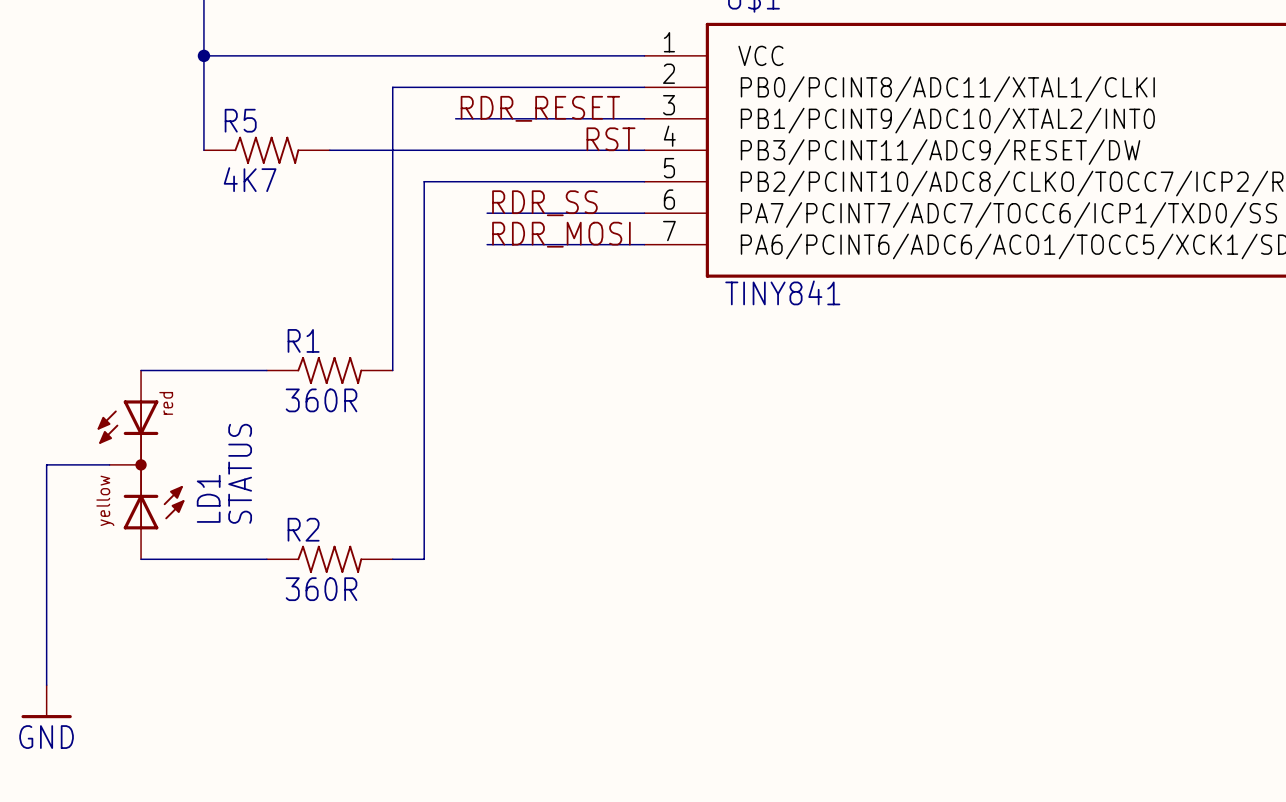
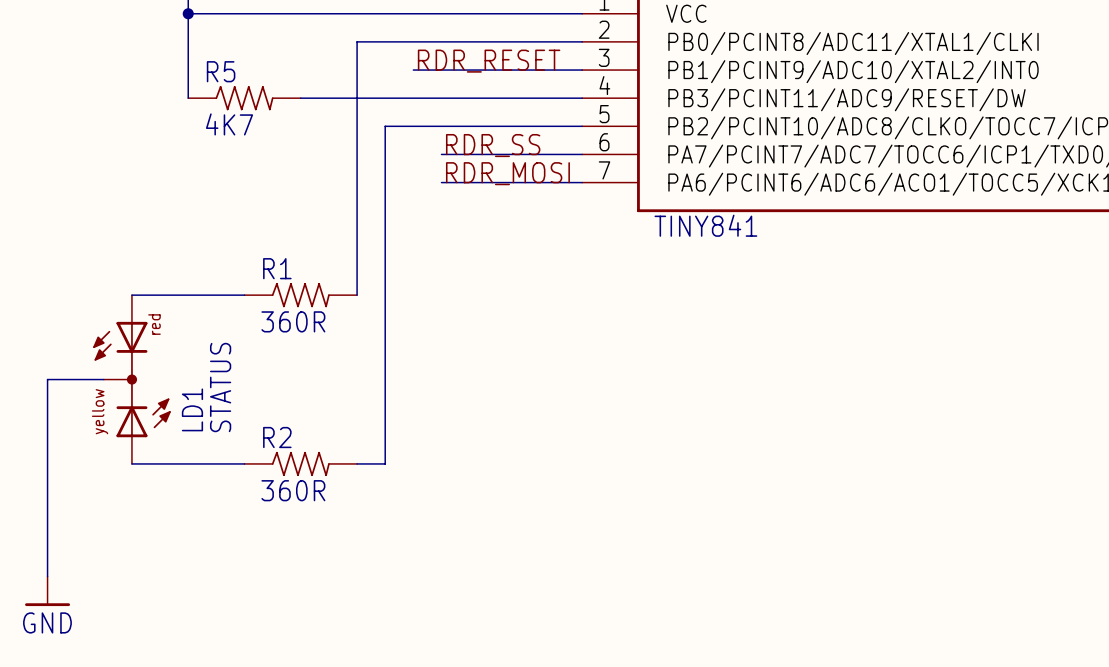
label: RST (610, 139) -> none

